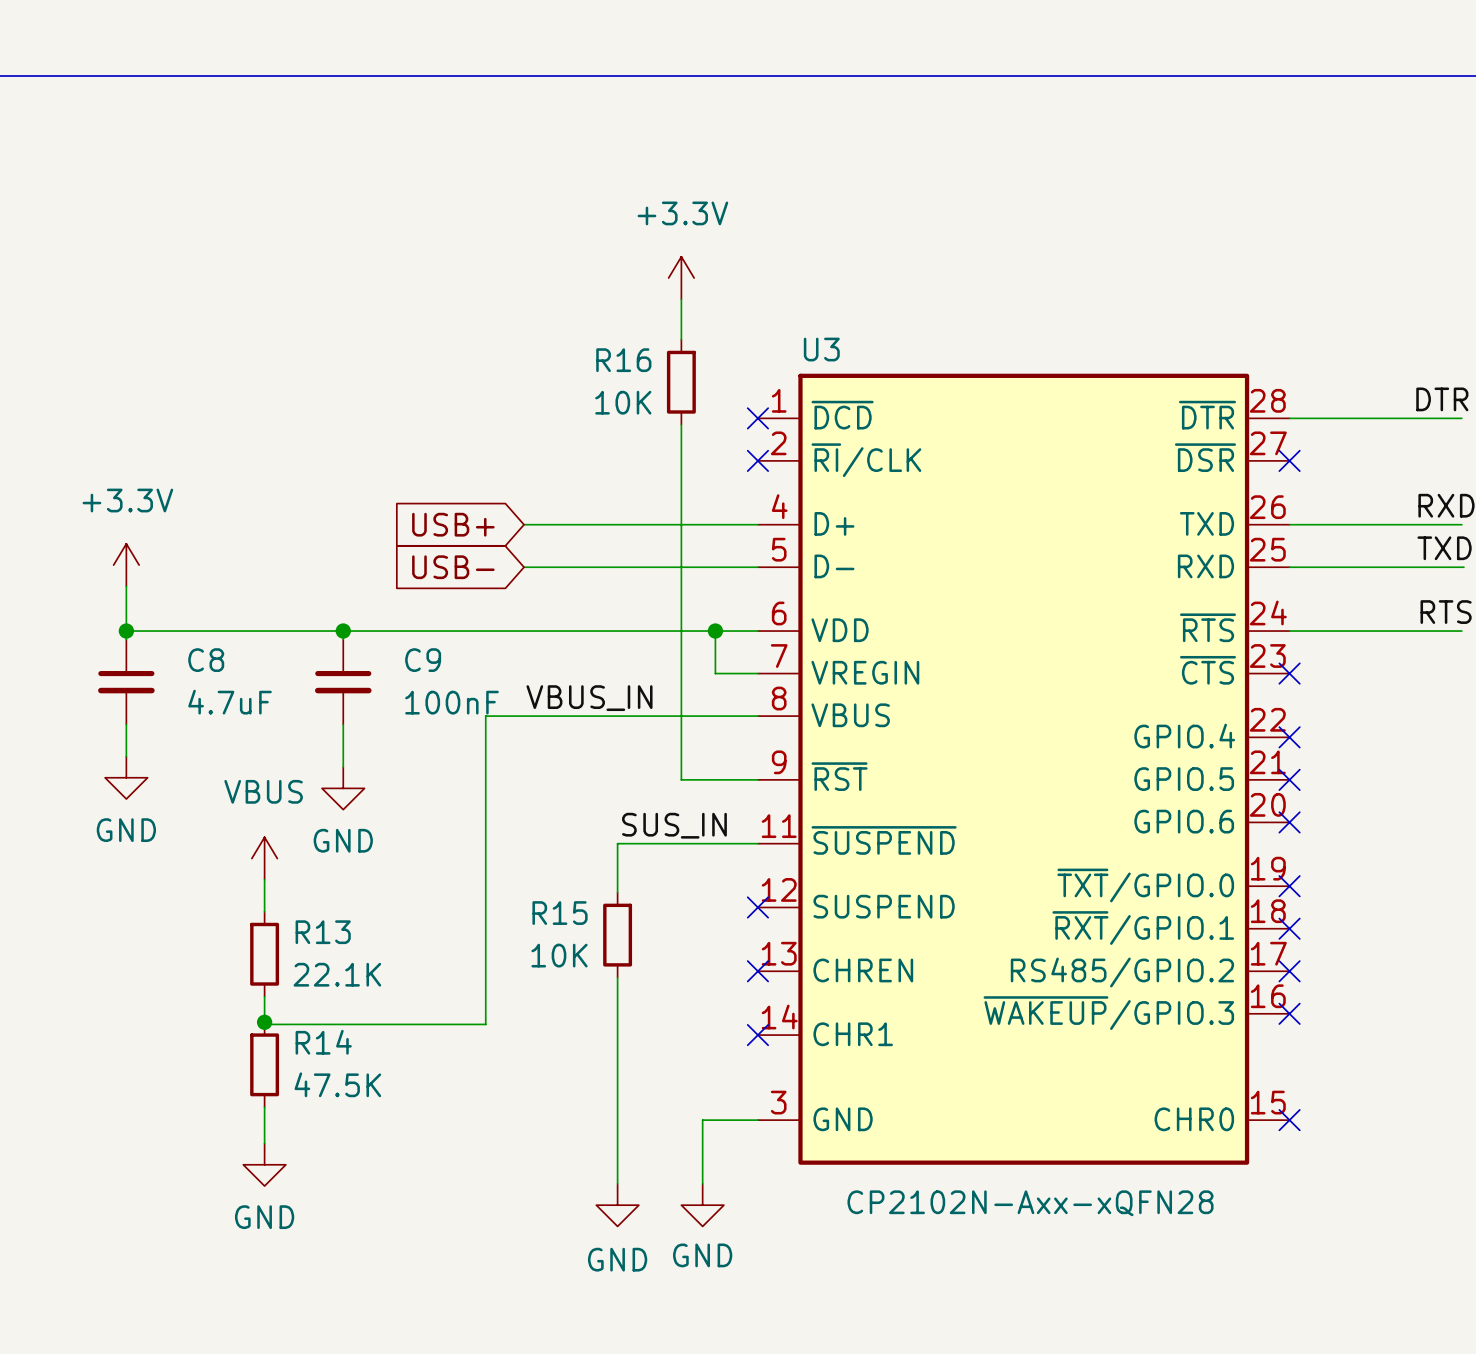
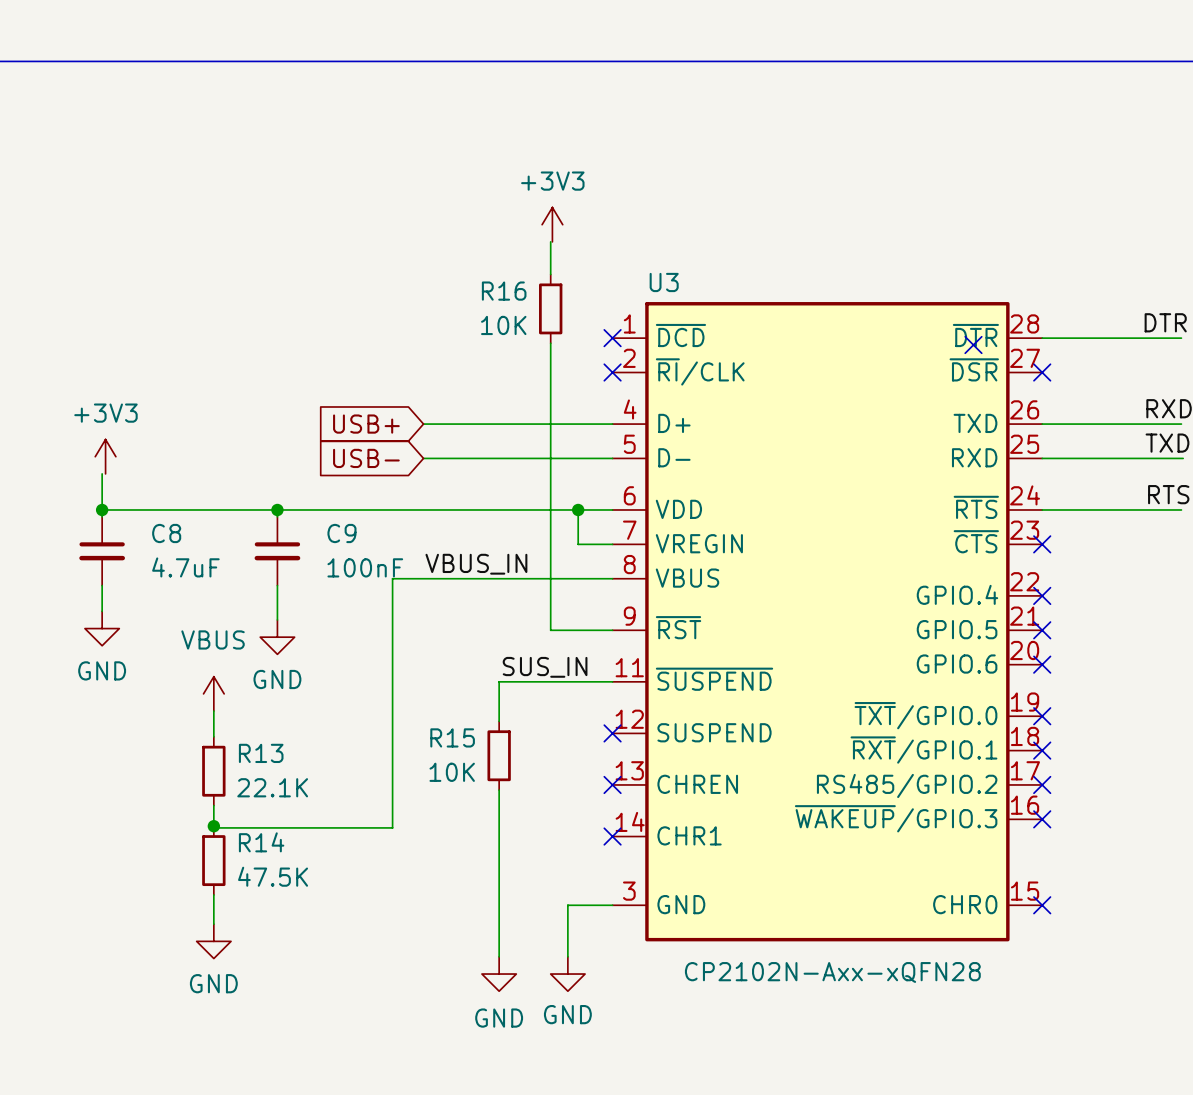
power symbol: +3.3V (681, 278) -> +3V3 (552, 224)
no-connect mark: none -> (973, 345)
power symbol: +3.3V (126, 565) -> +3V3 (105, 456)

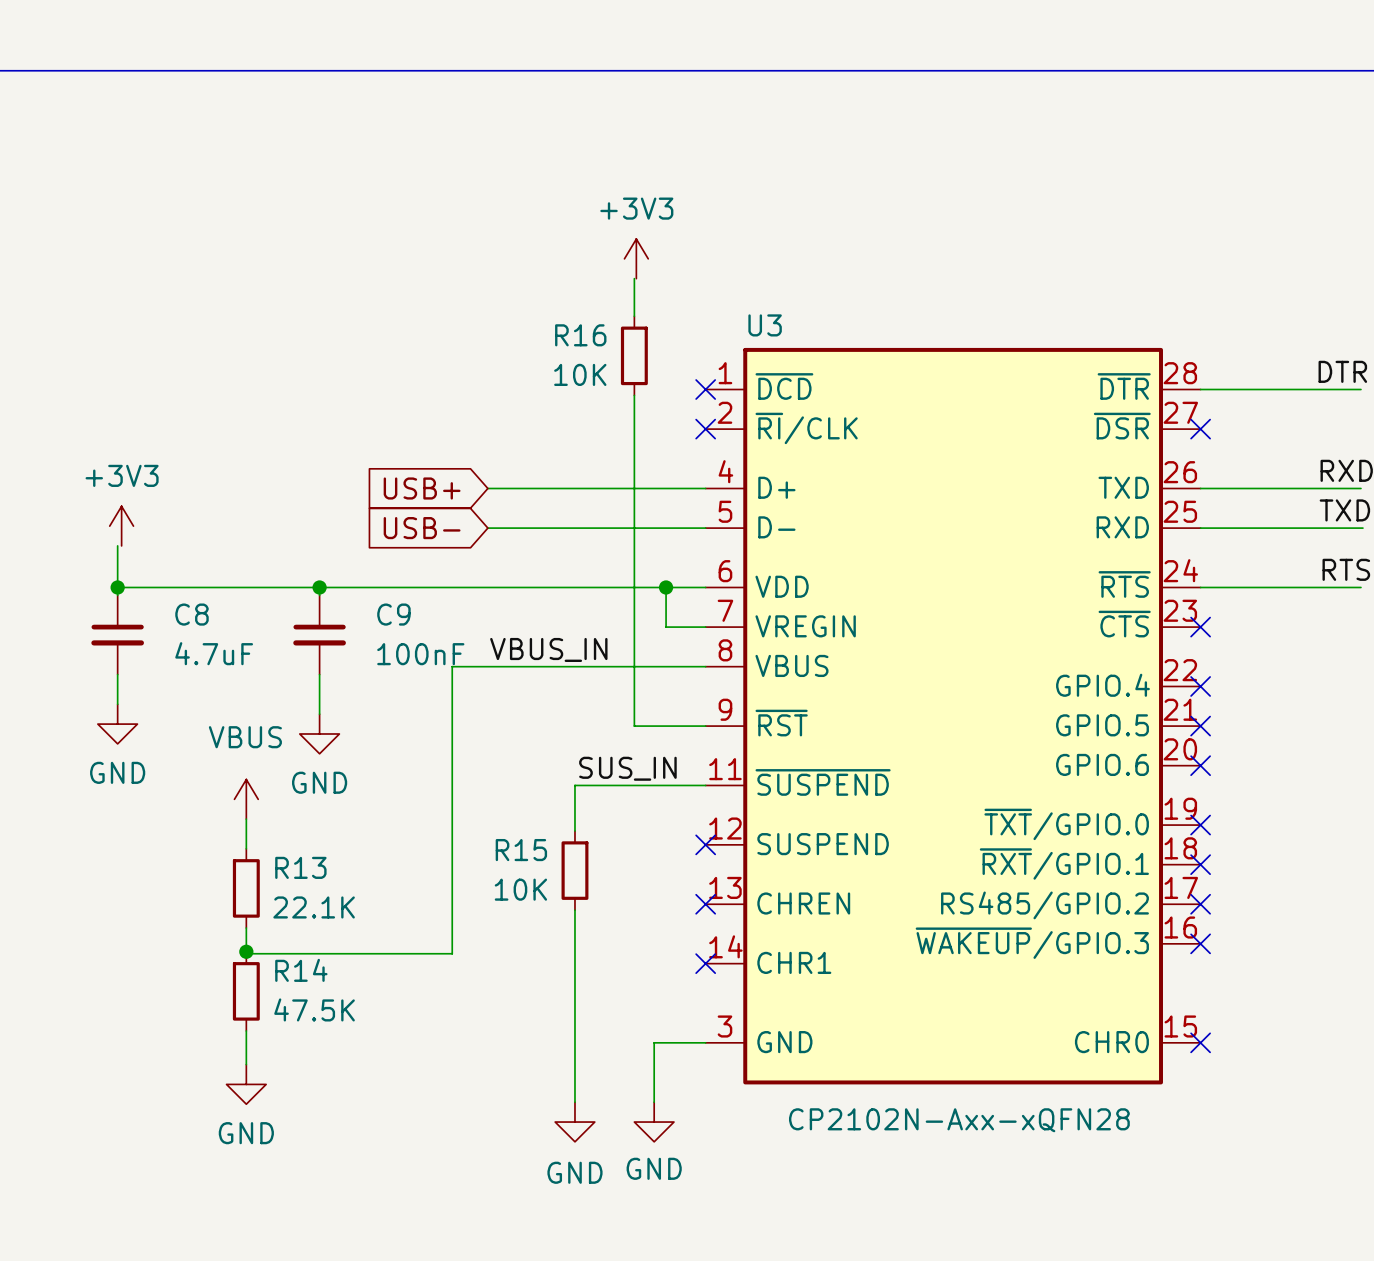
no-connect mark: (973, 345) -> none

